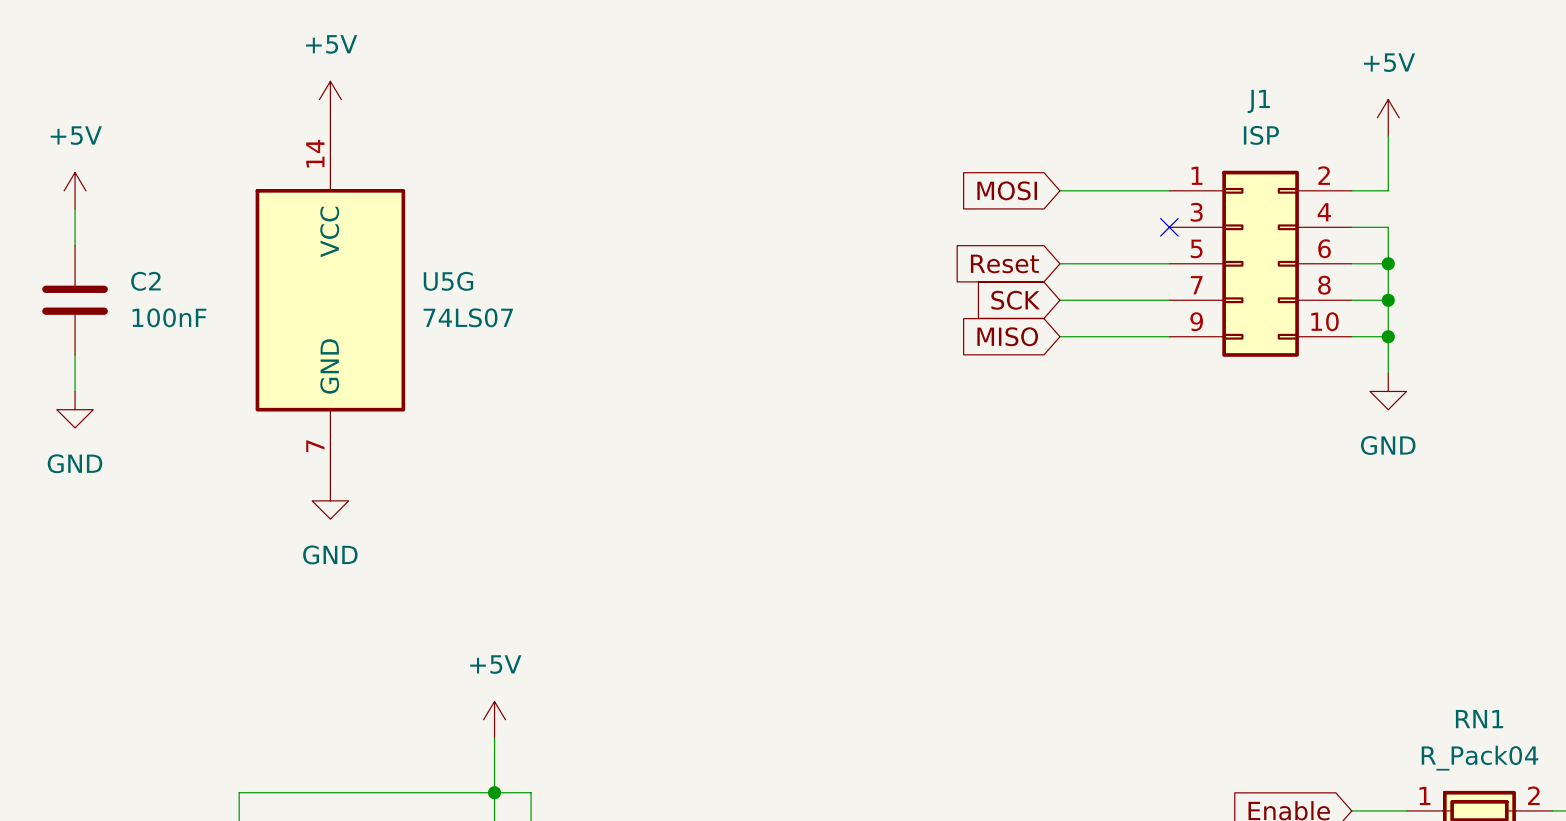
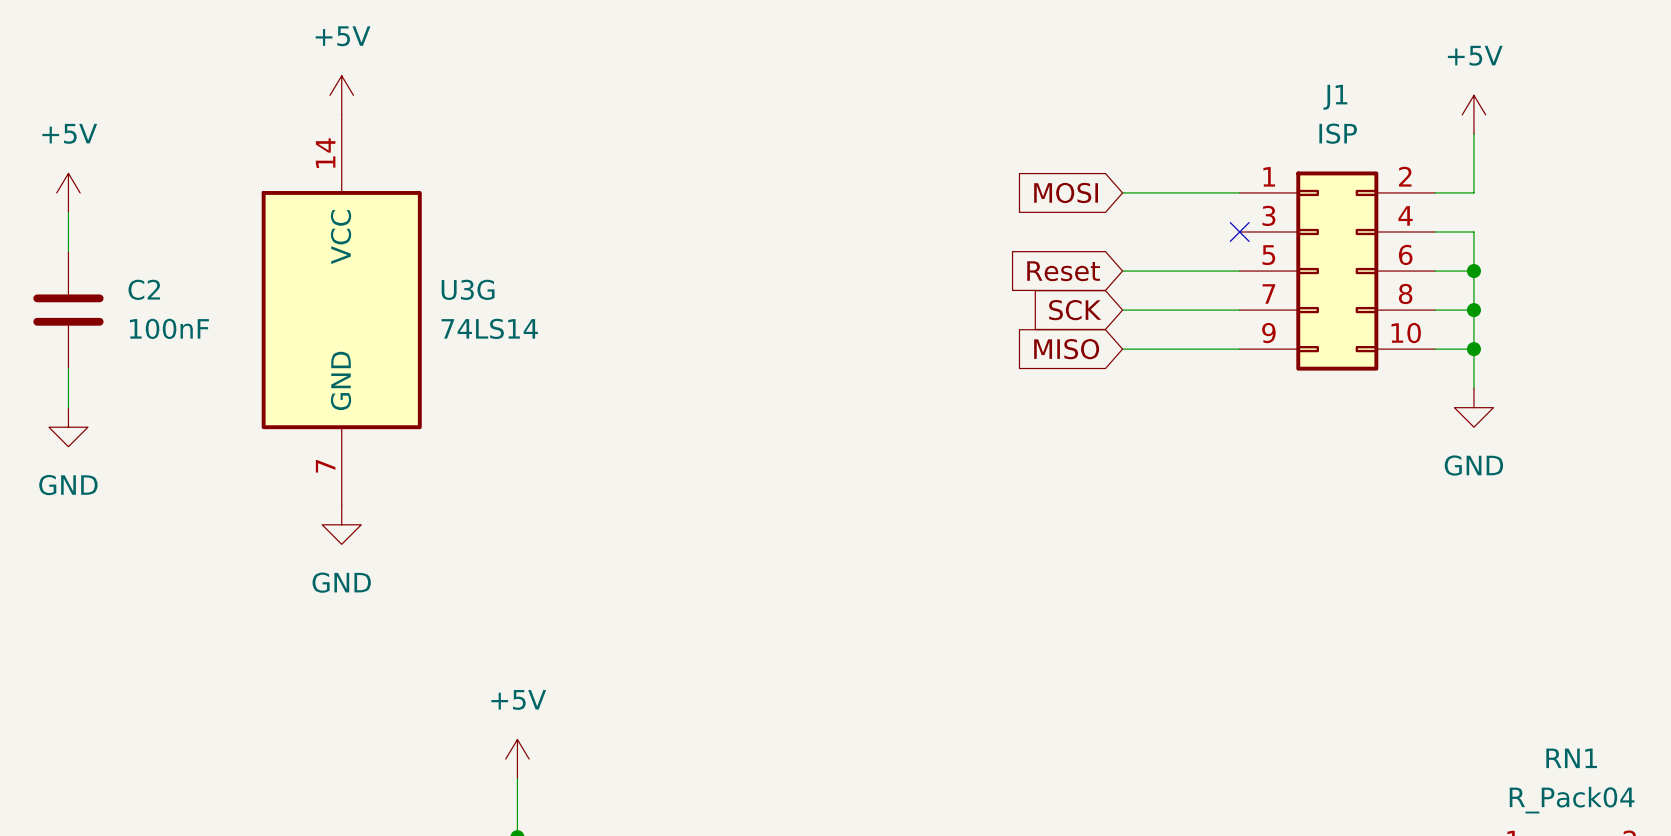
U5G name: U5G (448, 281) -> U3G (468, 289)
U5G value: 74LS07 (468, 317) -> 74LS14 (489, 328)

